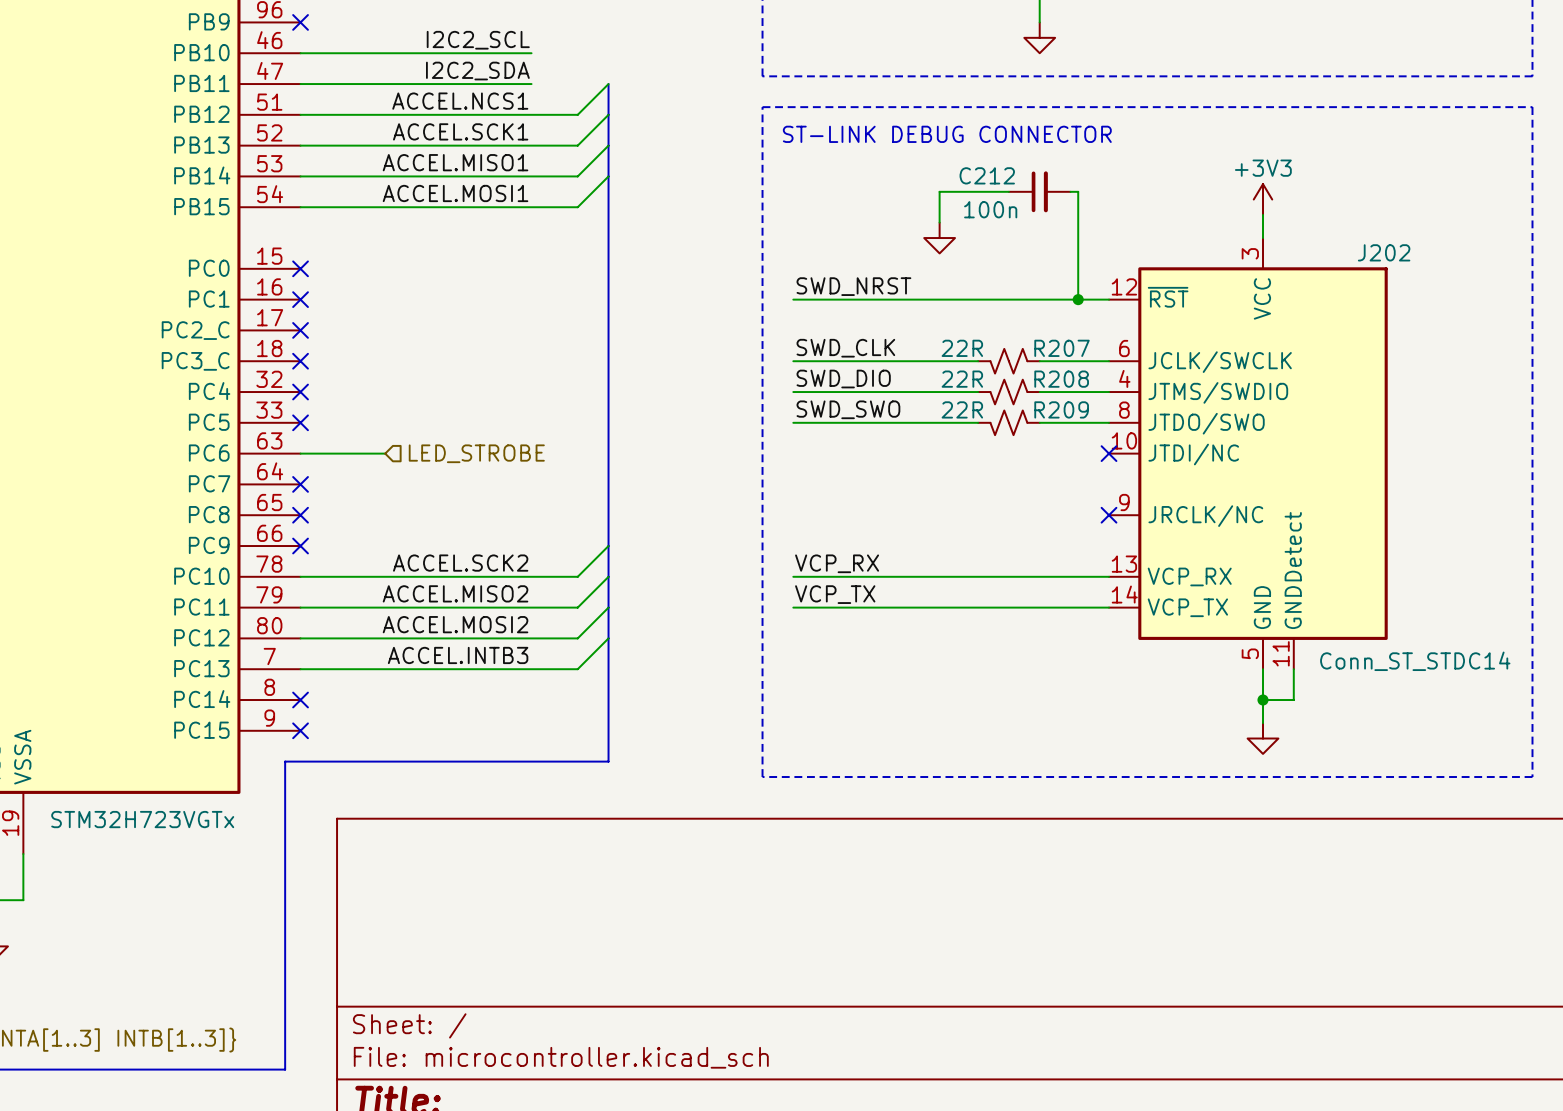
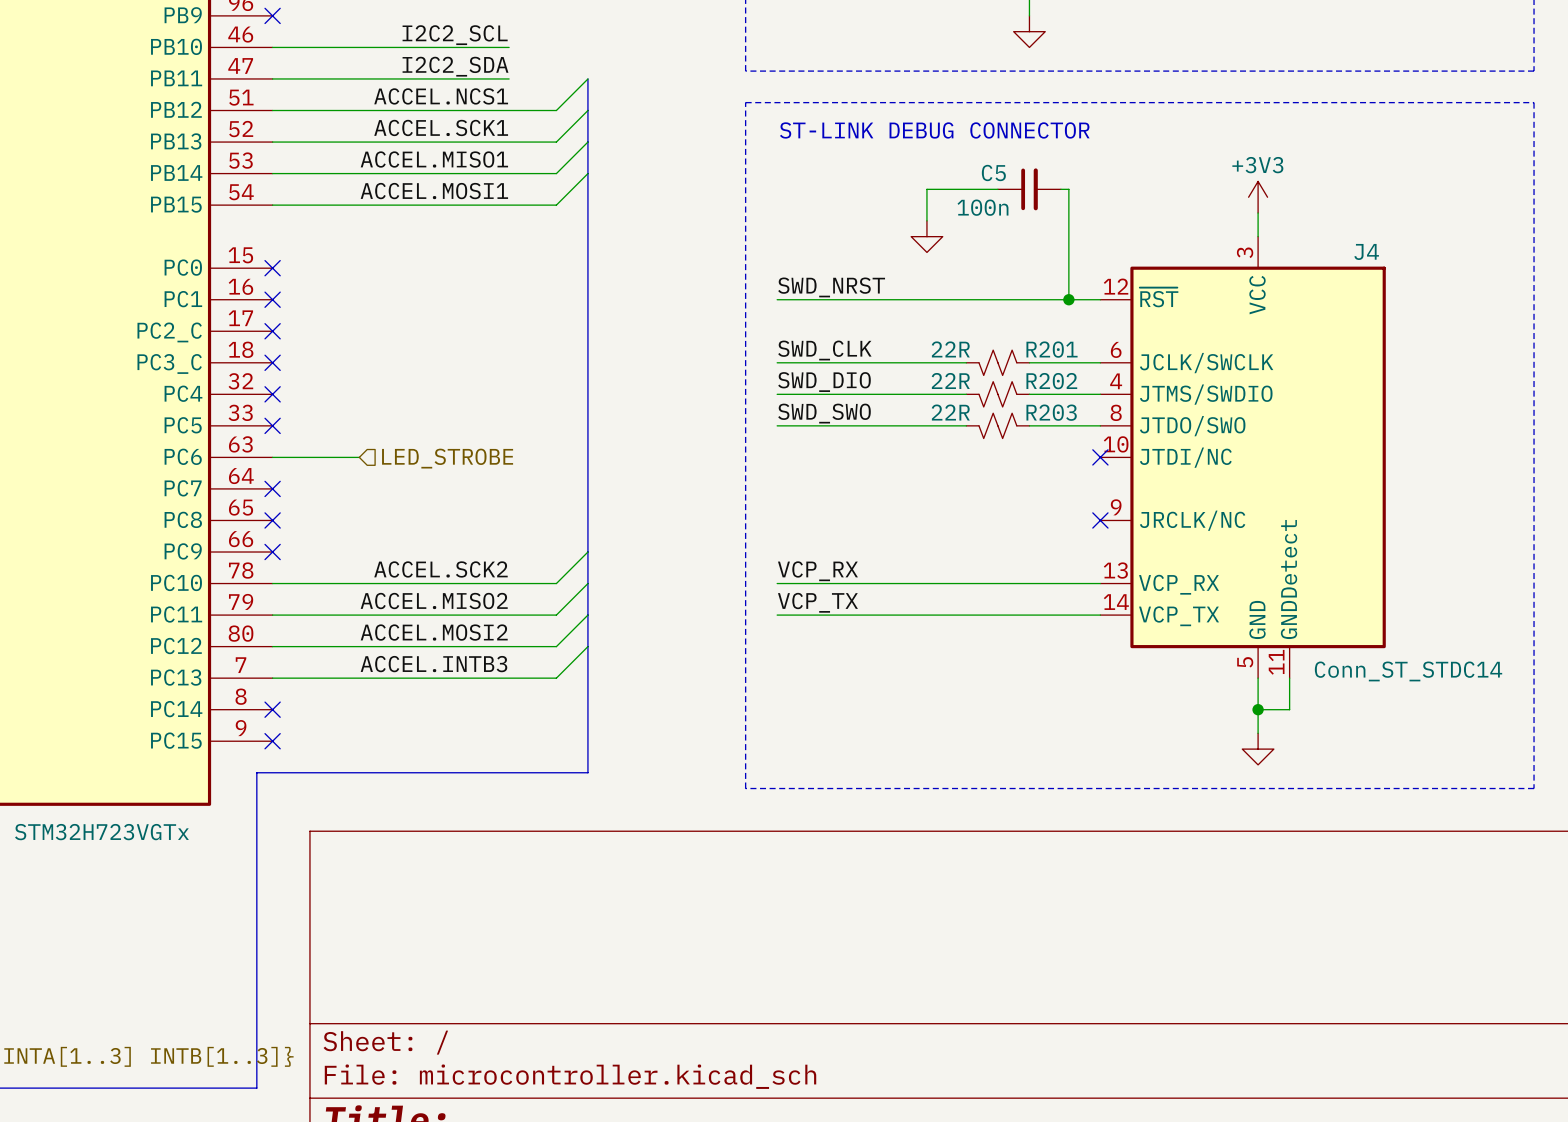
C212 name: C212 (987, 175) -> C5 (993, 172)
J202 name: J202 (1384, 252) -> J4 (1366, 251)
R207 name: R207 (1062, 348) -> R201 (1052, 349)
R208 name: R208 (1061, 379) -> R202 (1051, 381)
R209 name: R209 (1061, 409) -> R203 (1051, 412)

